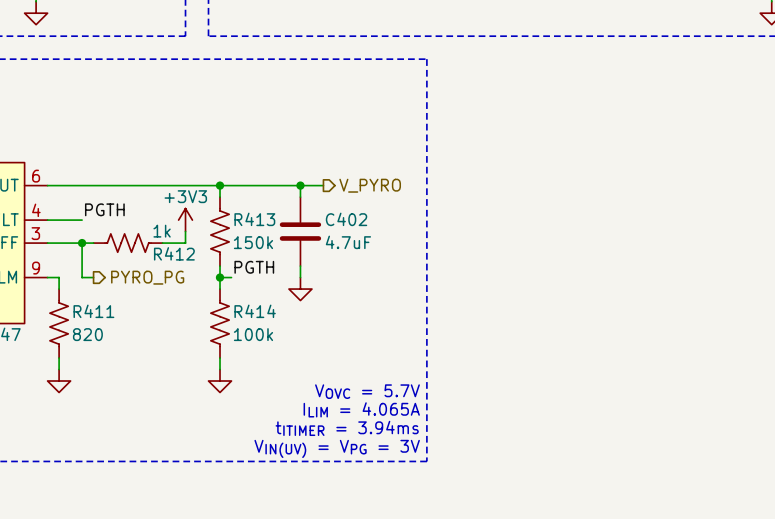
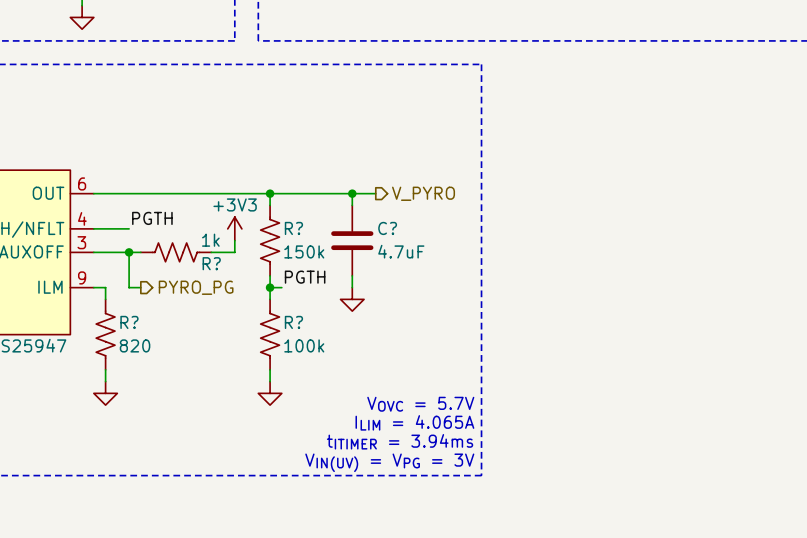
R413 name: R413 (254, 219) -> R? (293, 228)
C402 name: C402 (346, 219) -> C? (387, 228)
R412 name: R412 (174, 253) -> R? (211, 263)
R411 name: R411 (93, 311) -> R? (129, 322)
R414 name: R414 (255, 311) -> R? (293, 322)

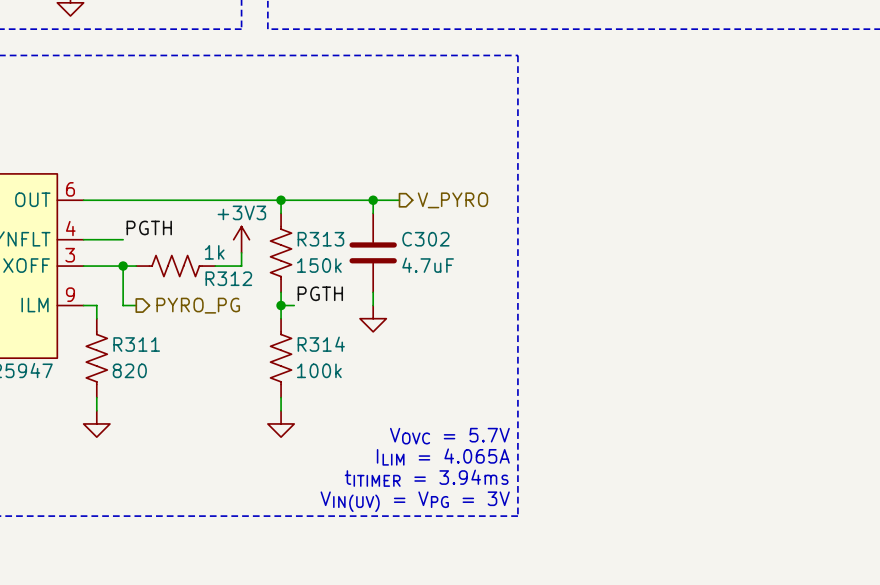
R? name: R? (293, 228) -> R313 (320, 239)
C? name: C? (387, 228) -> C302 (425, 239)
R? name: R? (211, 263) -> R312 (228, 278)
R? name: R? (129, 322) -> R311 (136, 344)
R? name: R? (293, 322) -> R314 (321, 344)

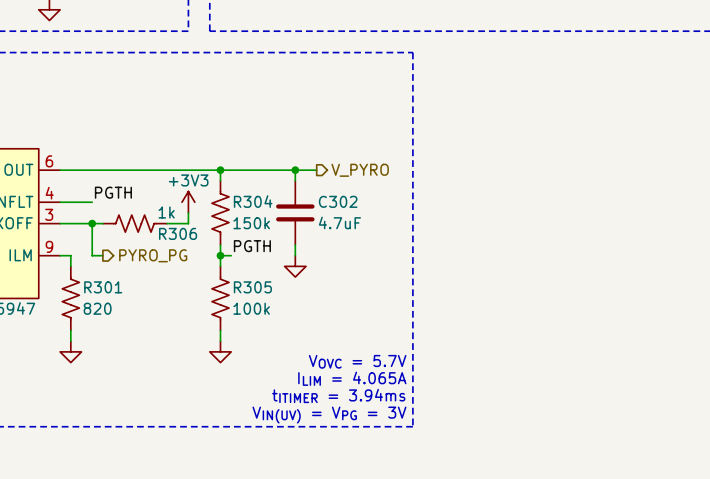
R313 name: R313 (320, 239) -> R304 (253, 201)
R312 name: R312 (228, 278) -> R306 (178, 233)
R311 name: R311 (136, 344) -> R301 (103, 287)
R314 name: R314 (321, 344) -> R305 (252, 287)

